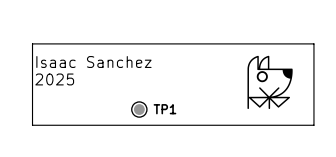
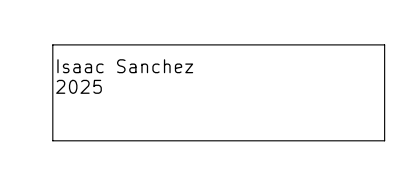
drawing: [247, 55, 293, 110] -> none
TP1: (139, 109) -> none

